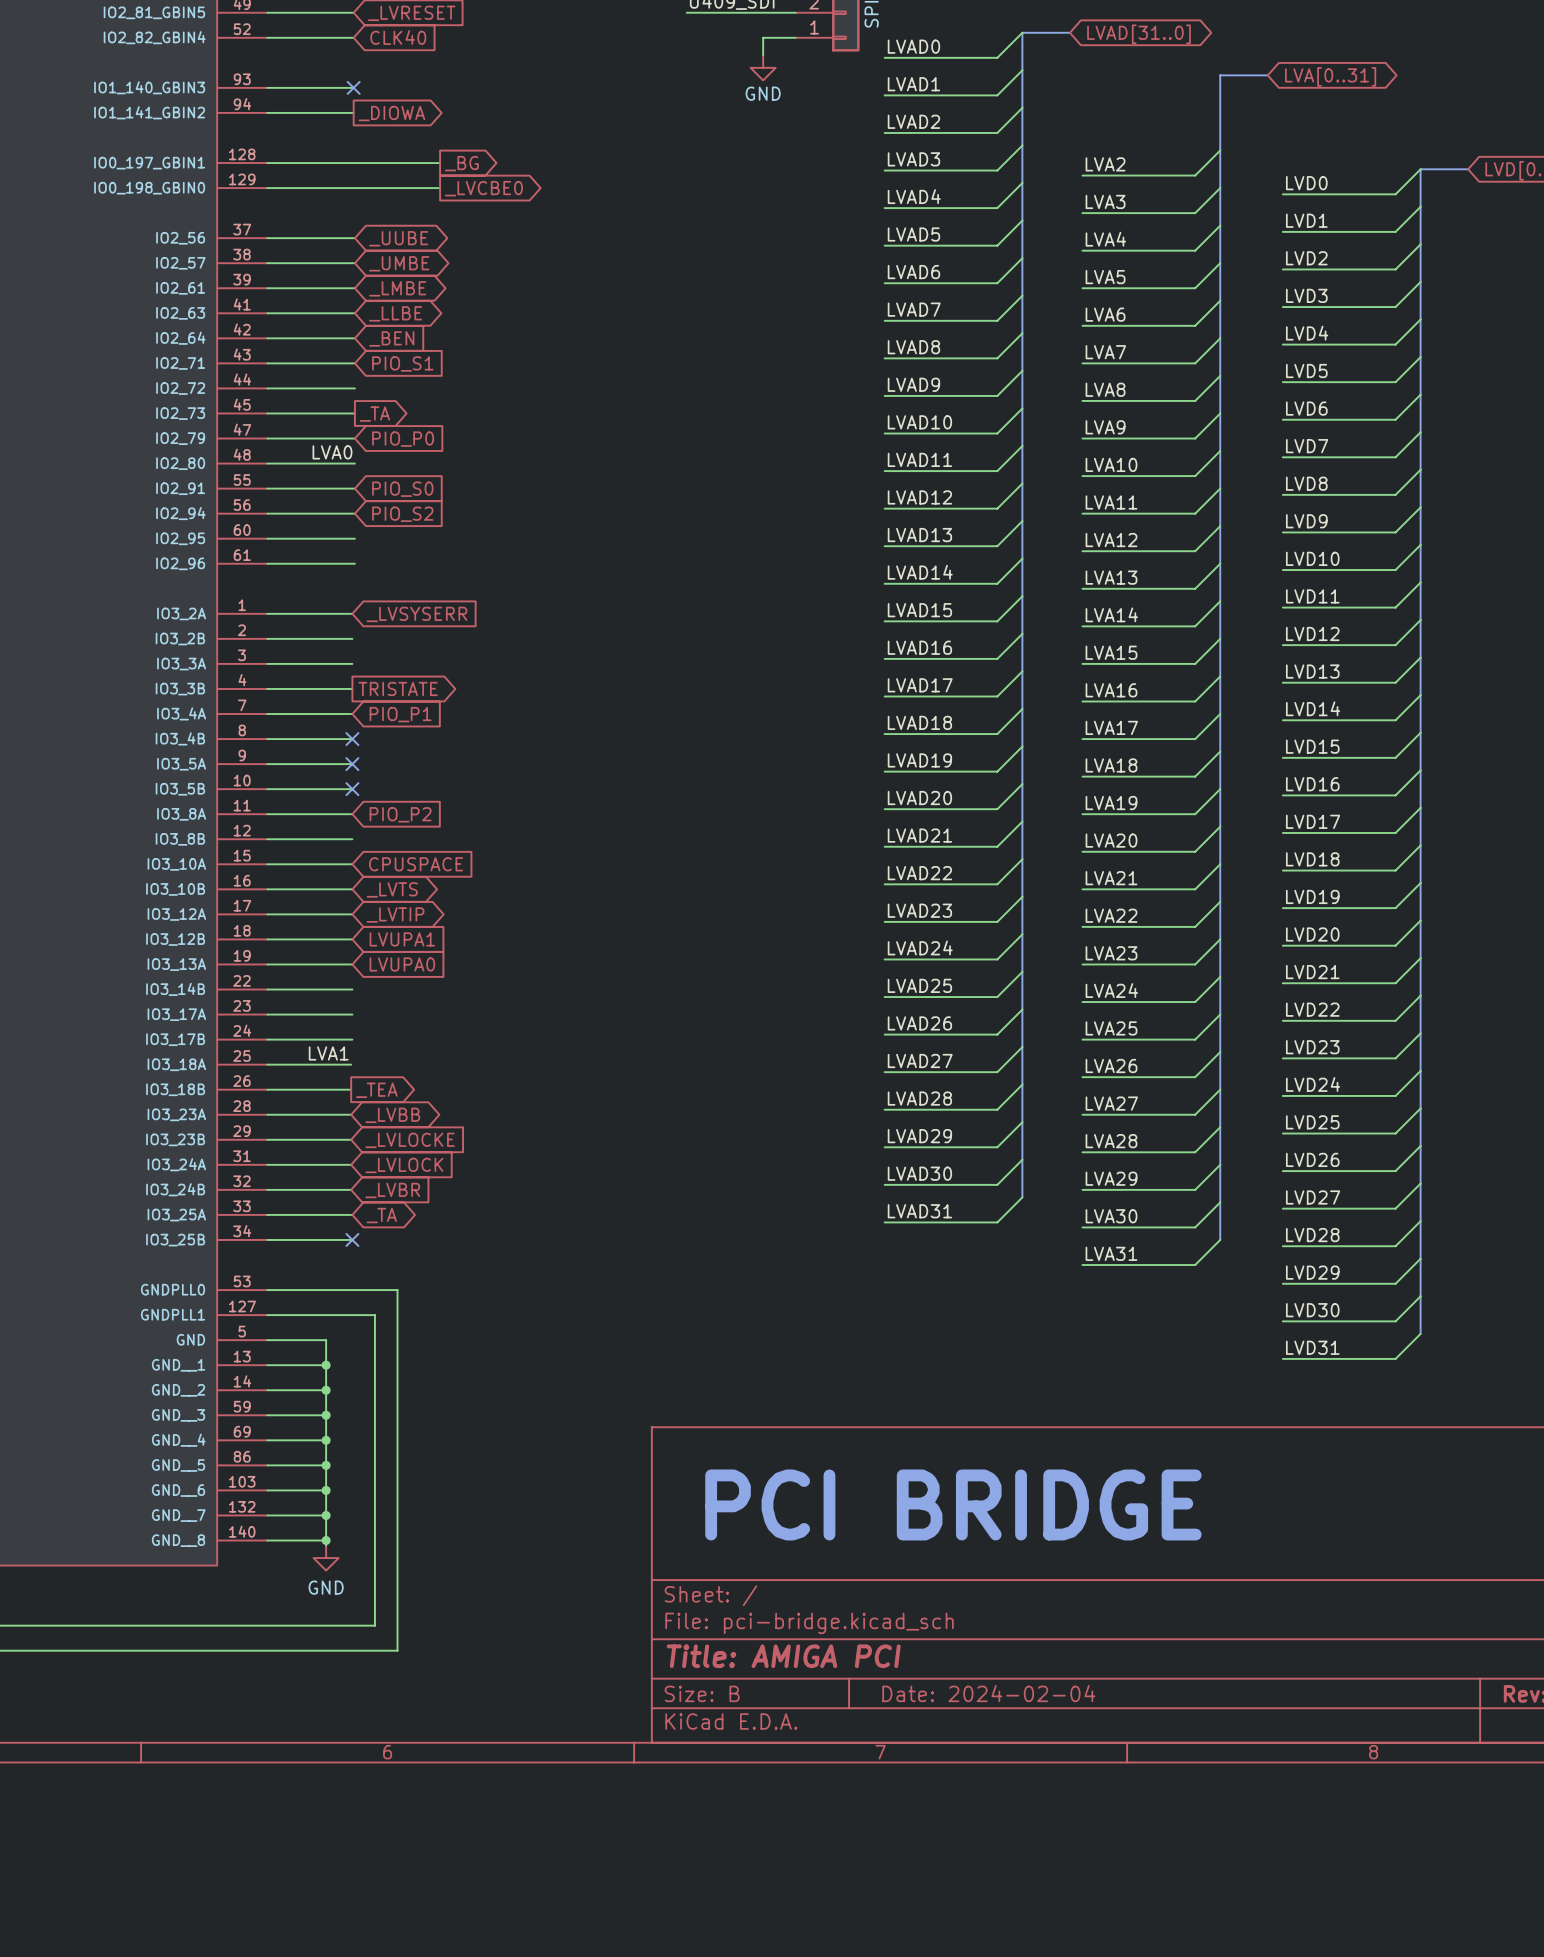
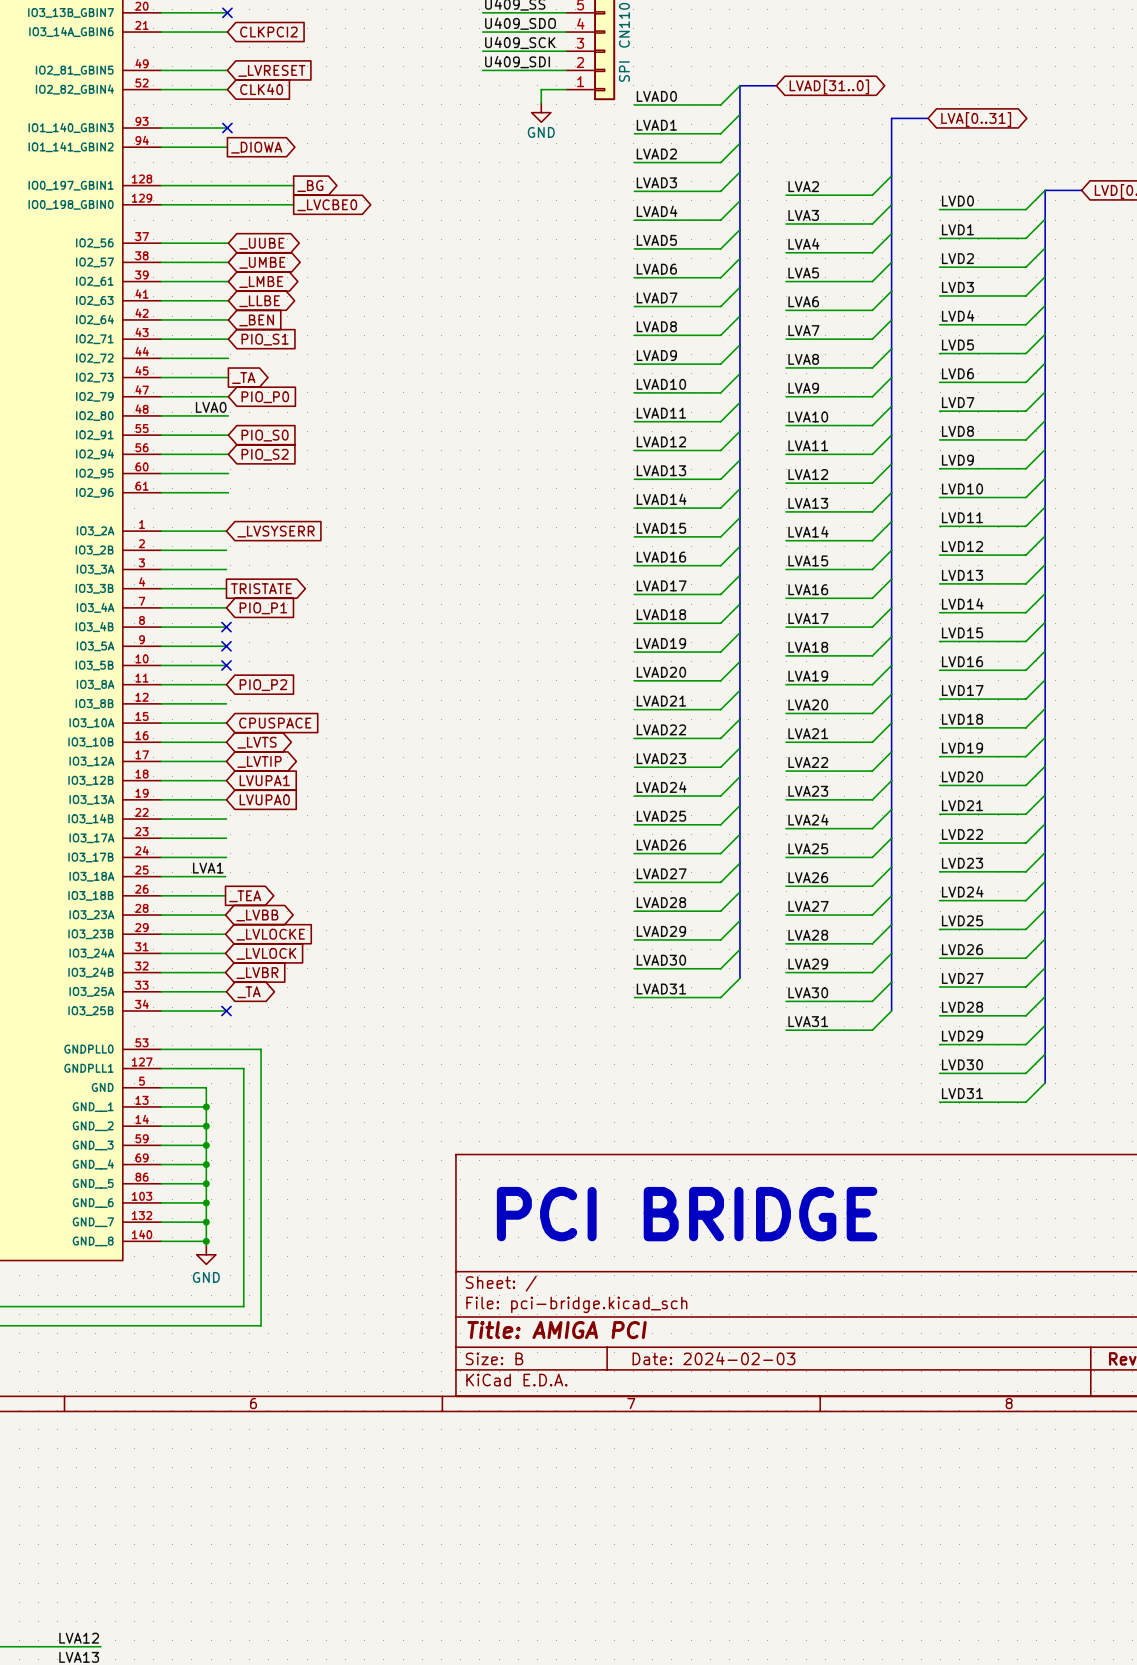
title block: Date: 2024-02-04 (988, 1693) -> Date: 2024-02-03 (713, 1358)

